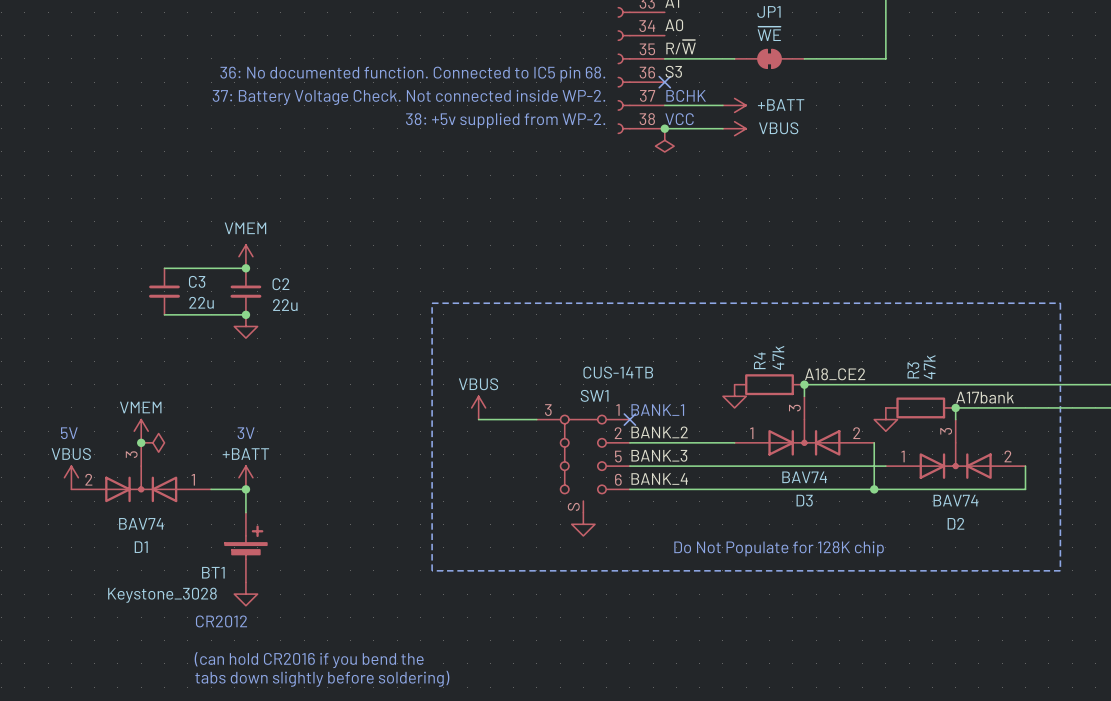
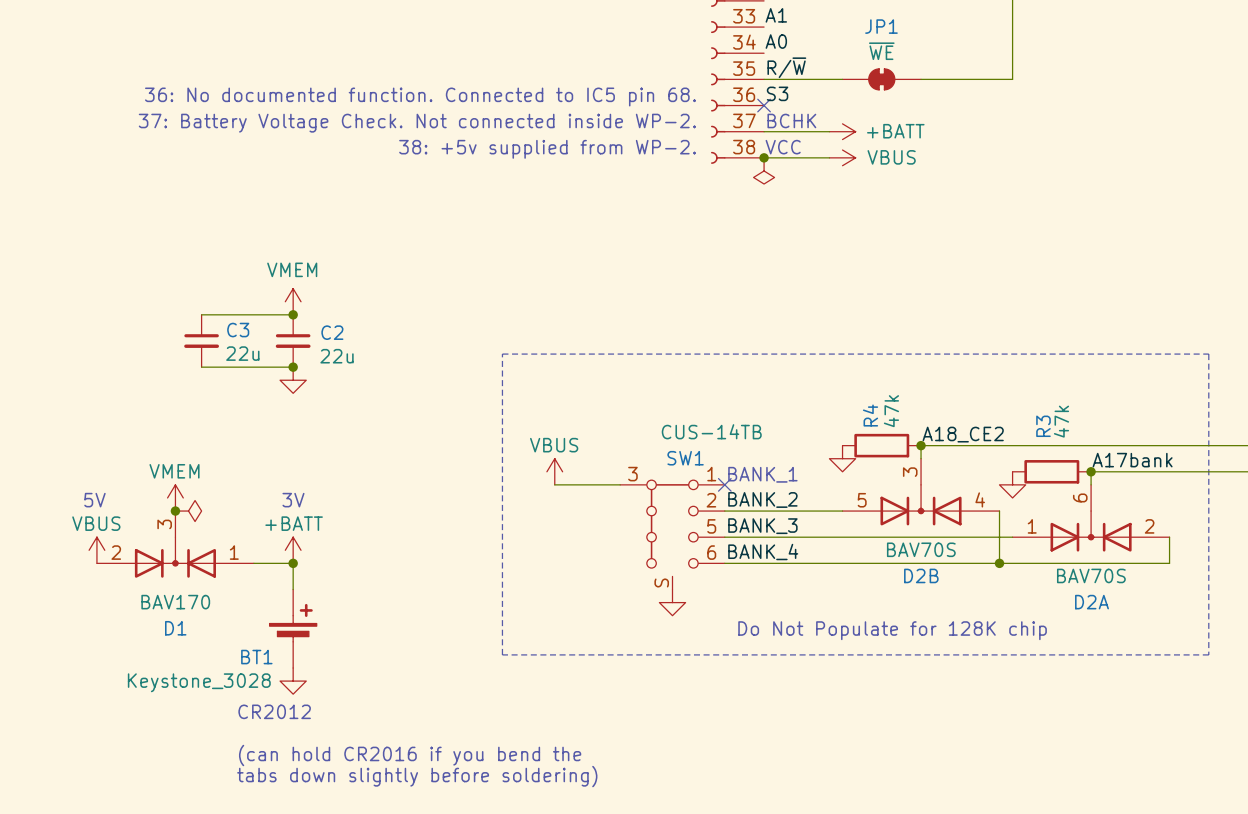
D3: BAV74 (804, 425) -> none
D2B: none -> BAV70S (921, 492)
D2 pin number: 3 (946, 431) -> 6 (1080, 497)
D2 value: BAV74 (955, 500) -> BAV70S (1091, 575)
D1 value: BAV74 (141, 523) -> BAV170 (175, 602)
D2 name: D2 (955, 523) -> D2A (1092, 602)

